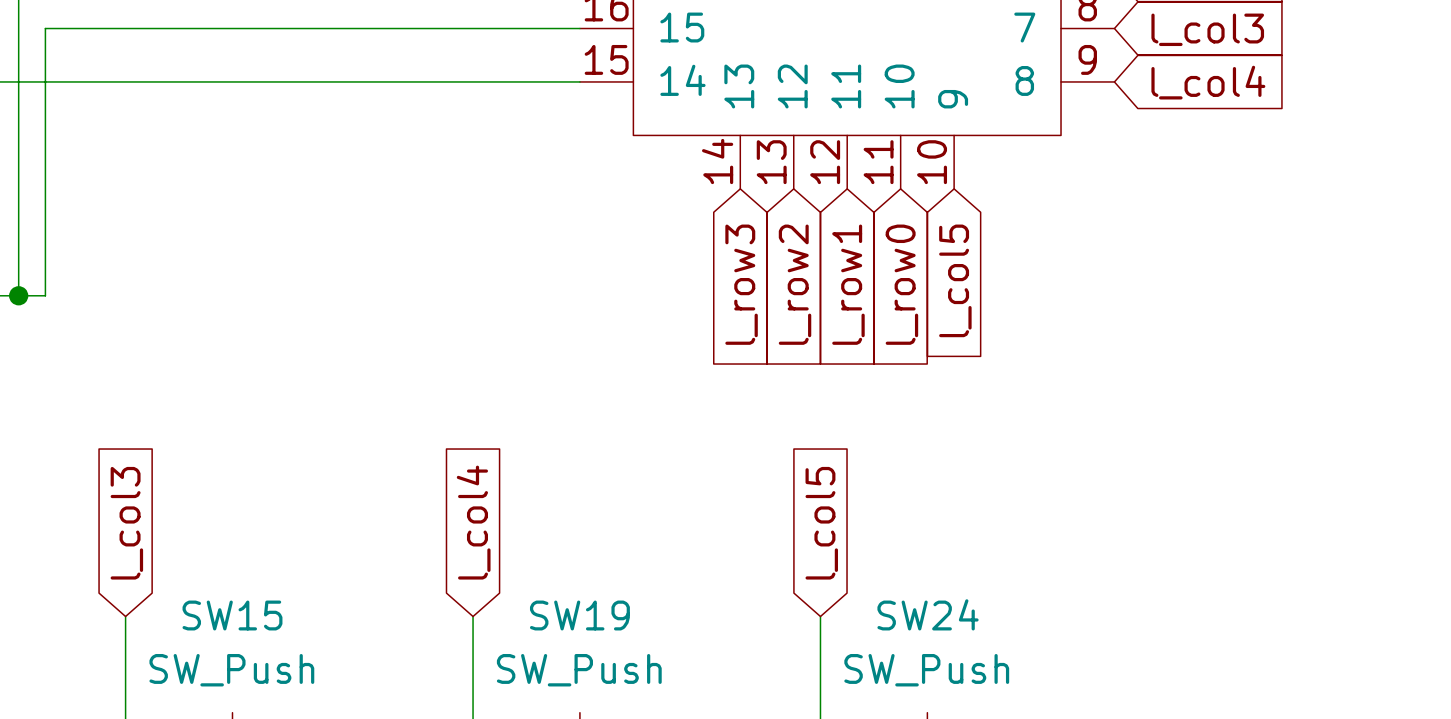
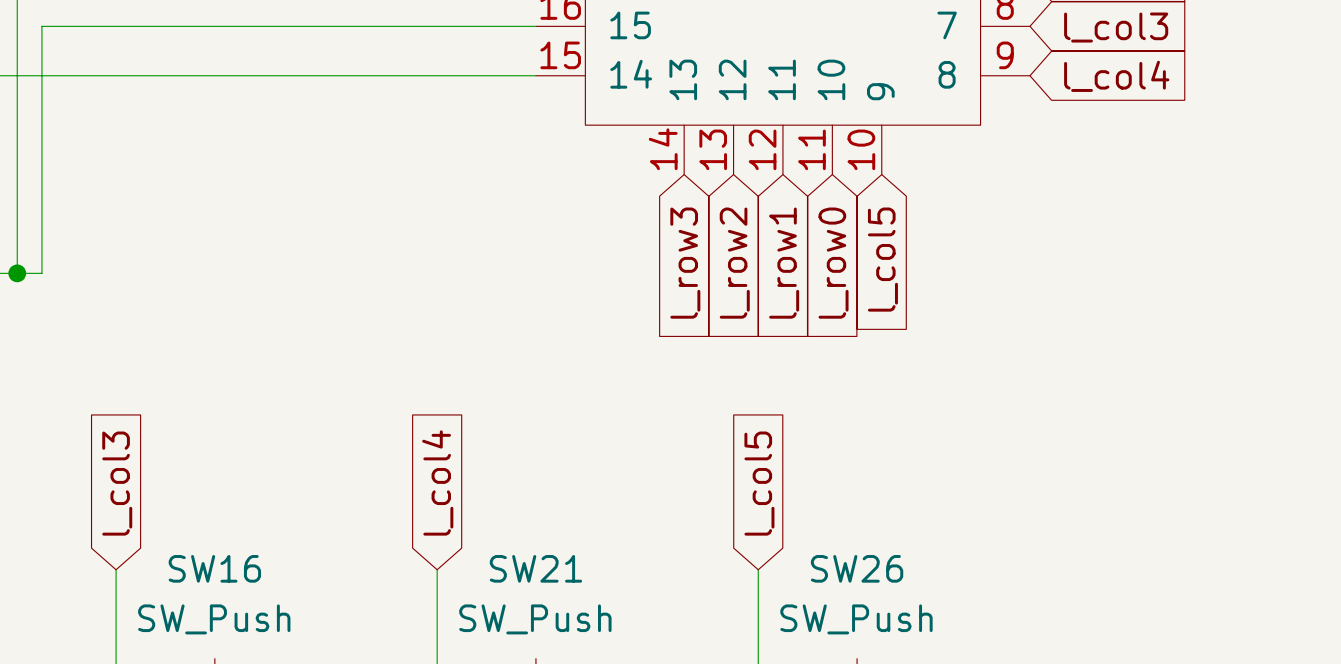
SW24 name: SW24 (928, 614) -> SW26 (857, 568)
SW15 name: SW15 (232, 615) -> SW16 (214, 568)
SW19 name: SW19 (579, 615) -> SW21 (535, 568)

